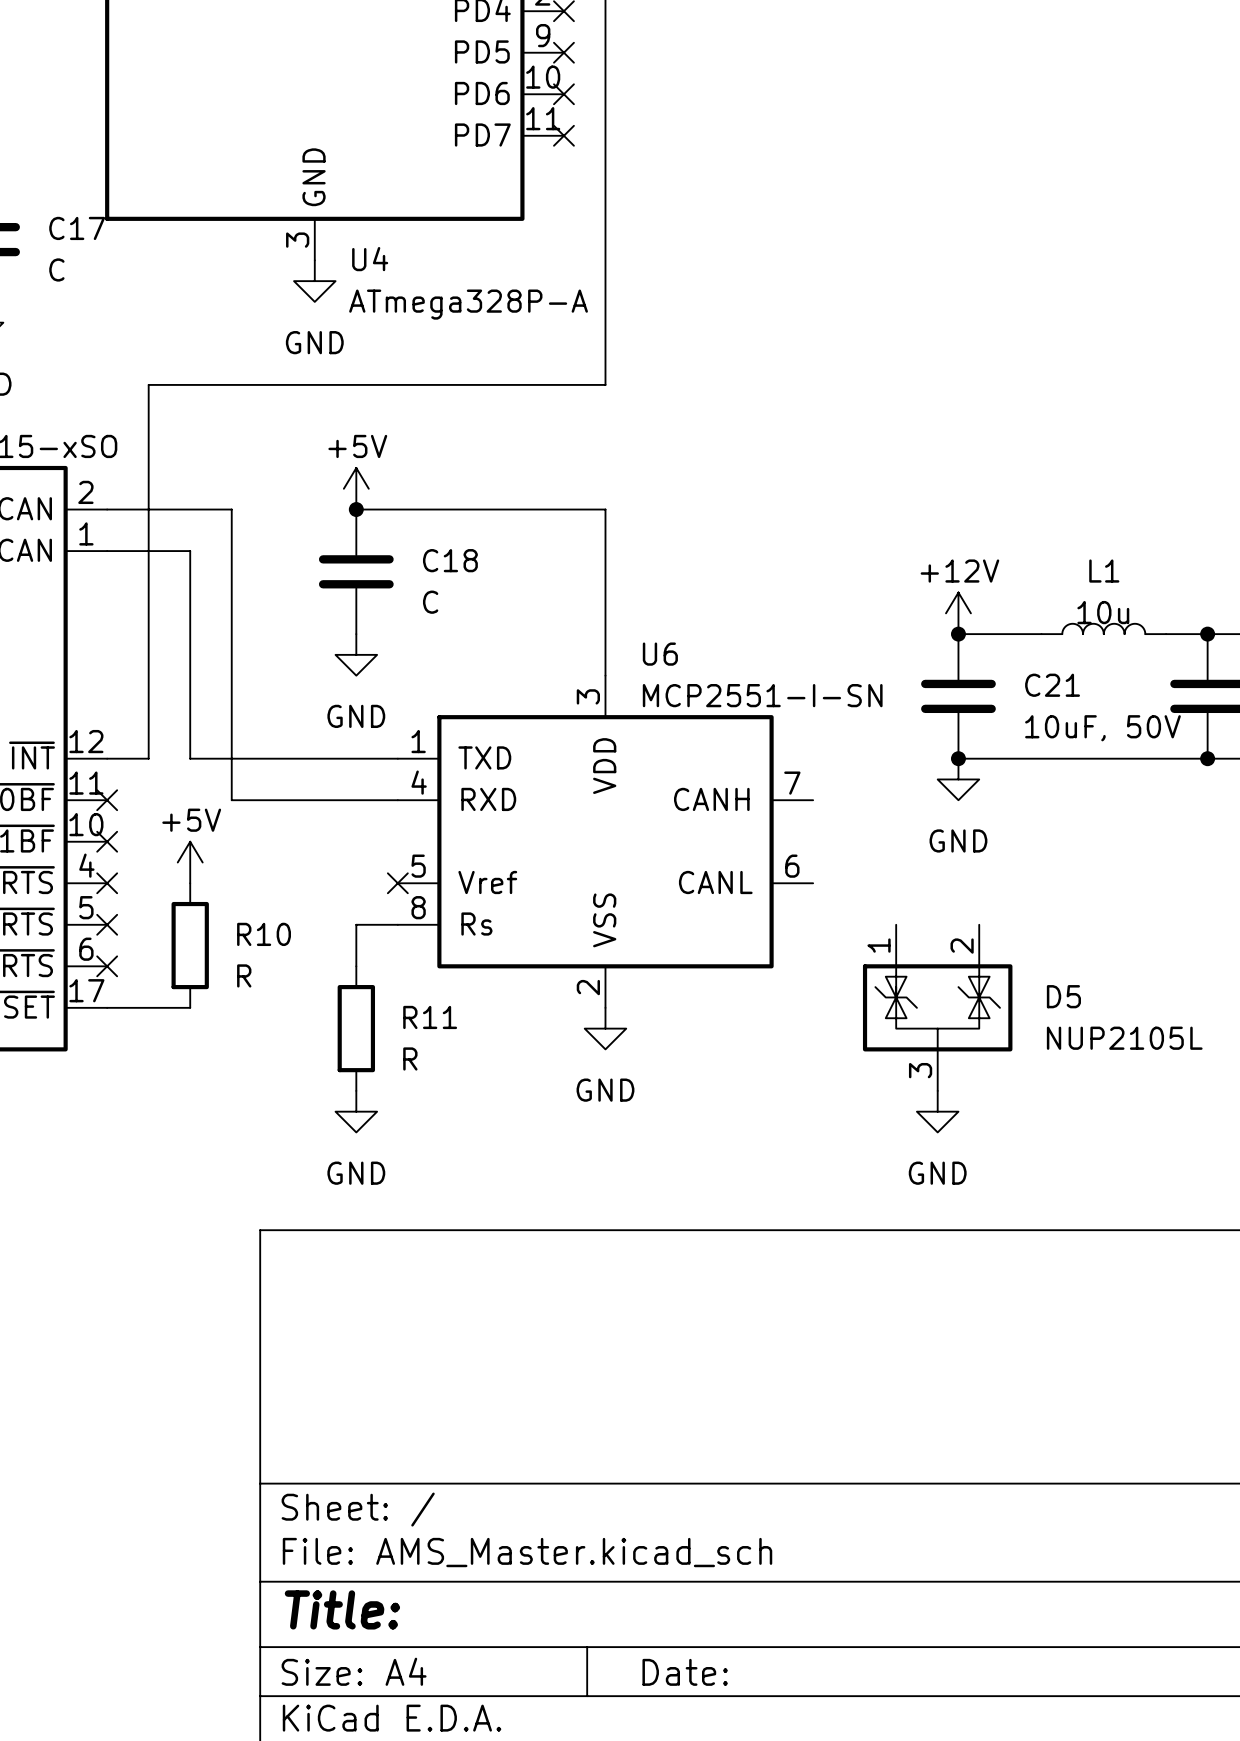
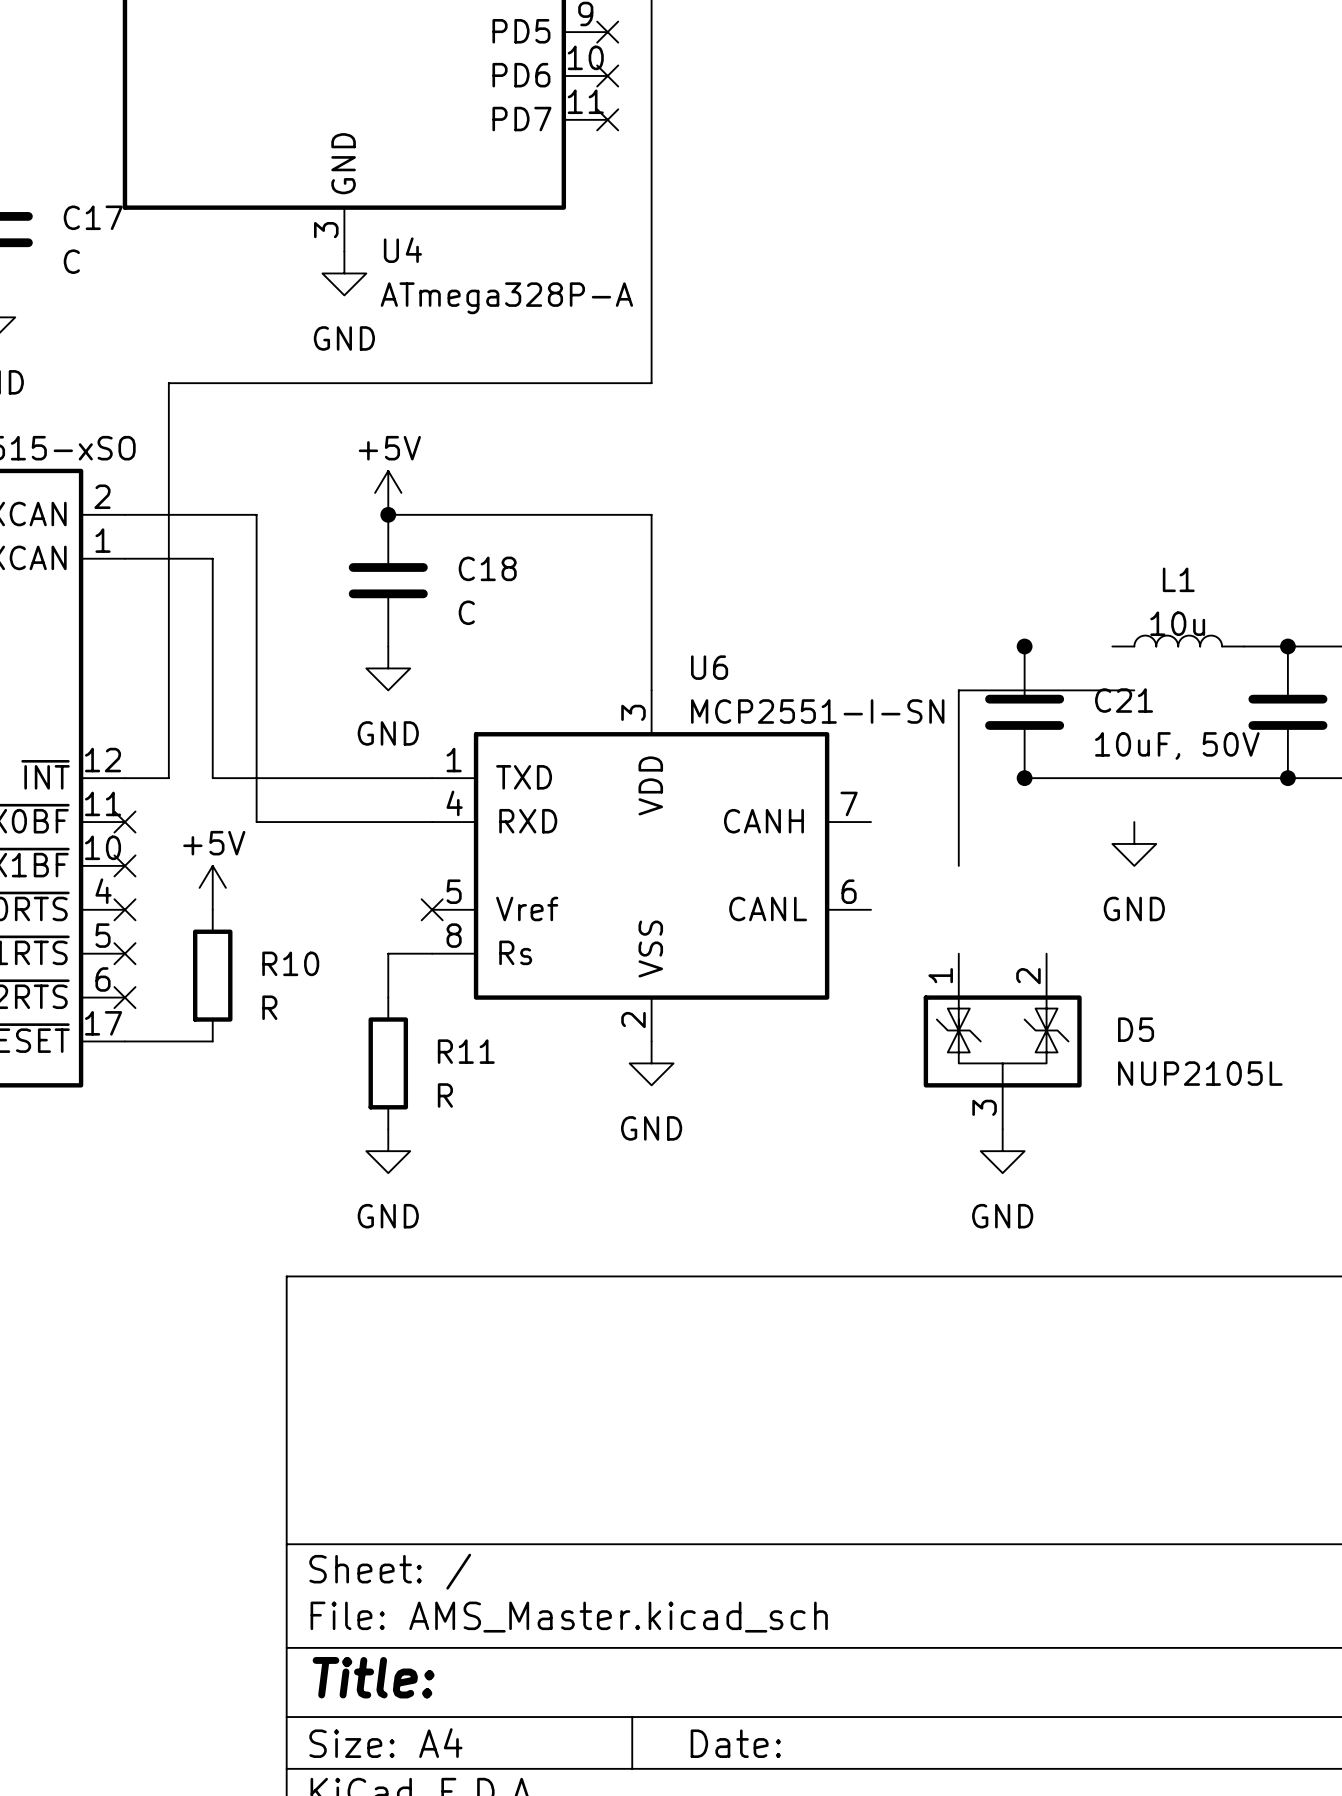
power symbol: +12V (958, 613) -> none
wire: (958, 634) (1041, 634) -> none
wire: none -> (1134, 690) (958, 690) (958, 865)
power symbol position: GND (958, 779) -> GND (1134, 843)

